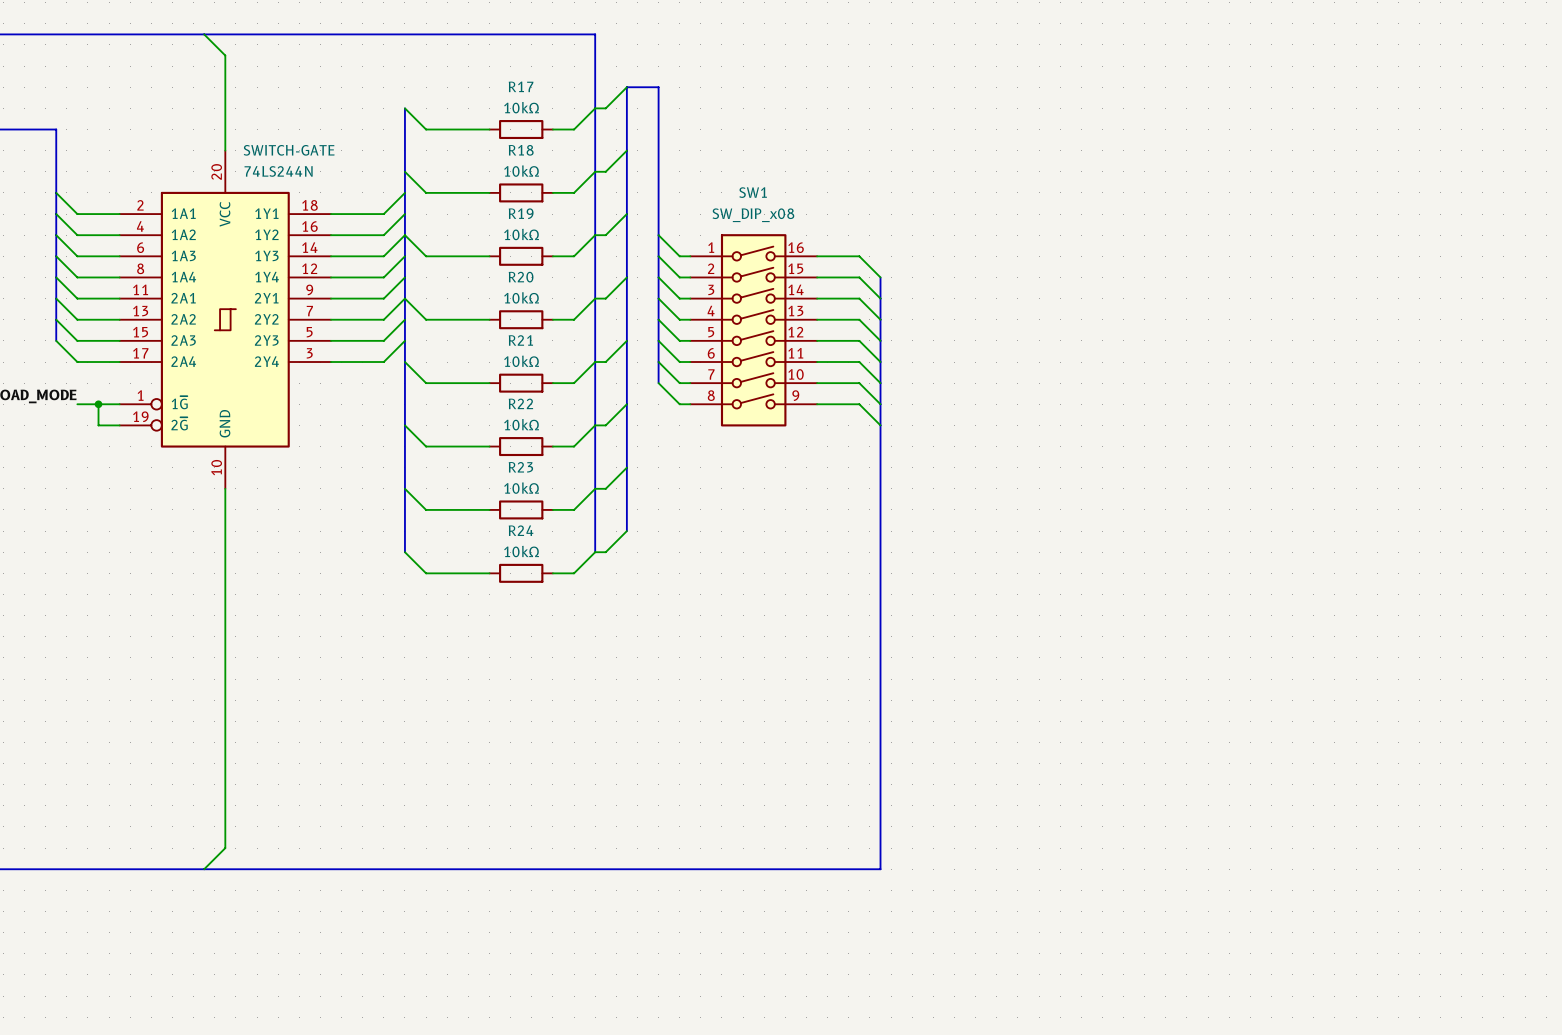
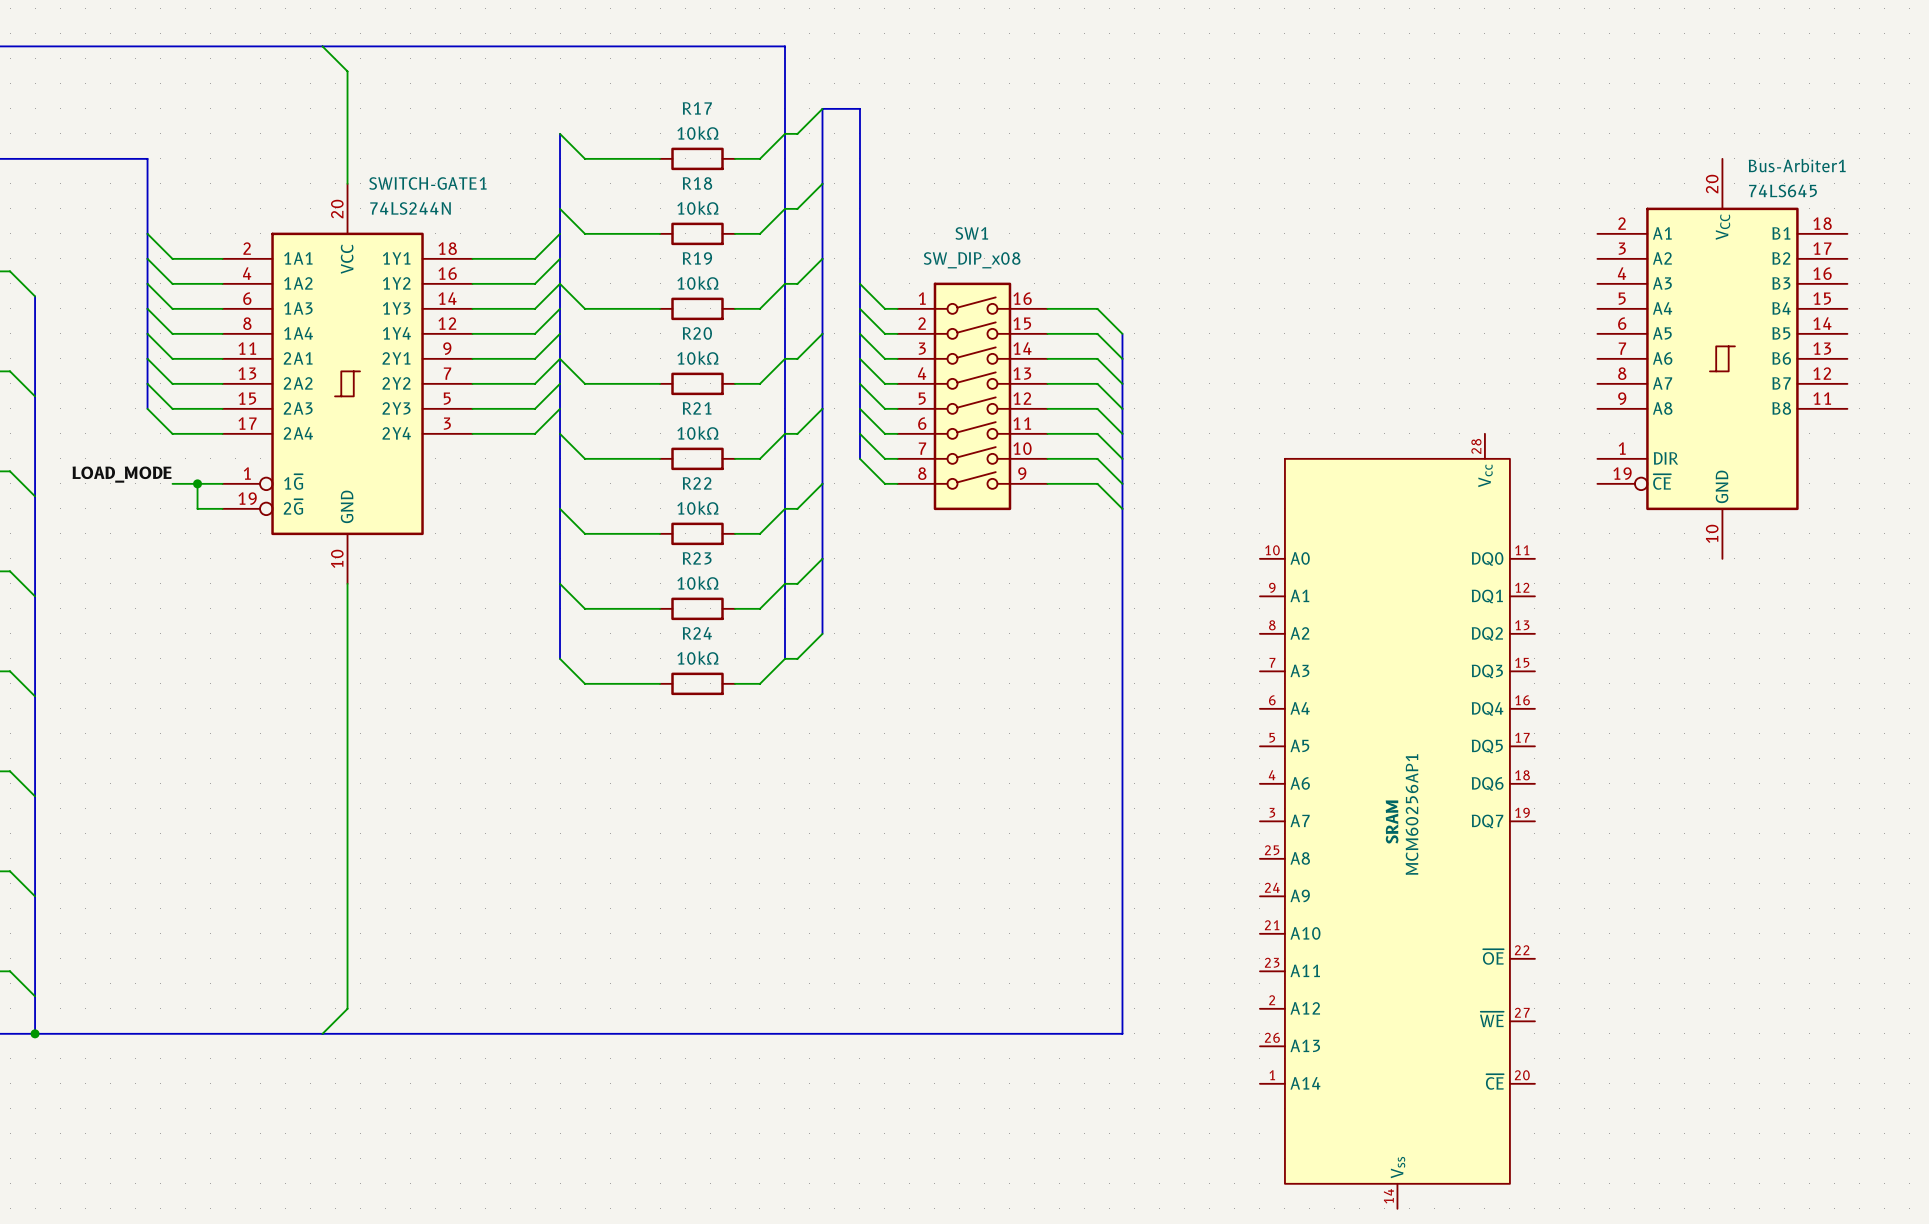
SWITCH-GATE name: SWITCH-GATE (289, 150) -> SWITCH-GATE1 (427, 183)
Bus-Arbiter1: none -> 74LS645 (1722, 358)
MCM60256AP1: none -> SRAM (1397, 821)

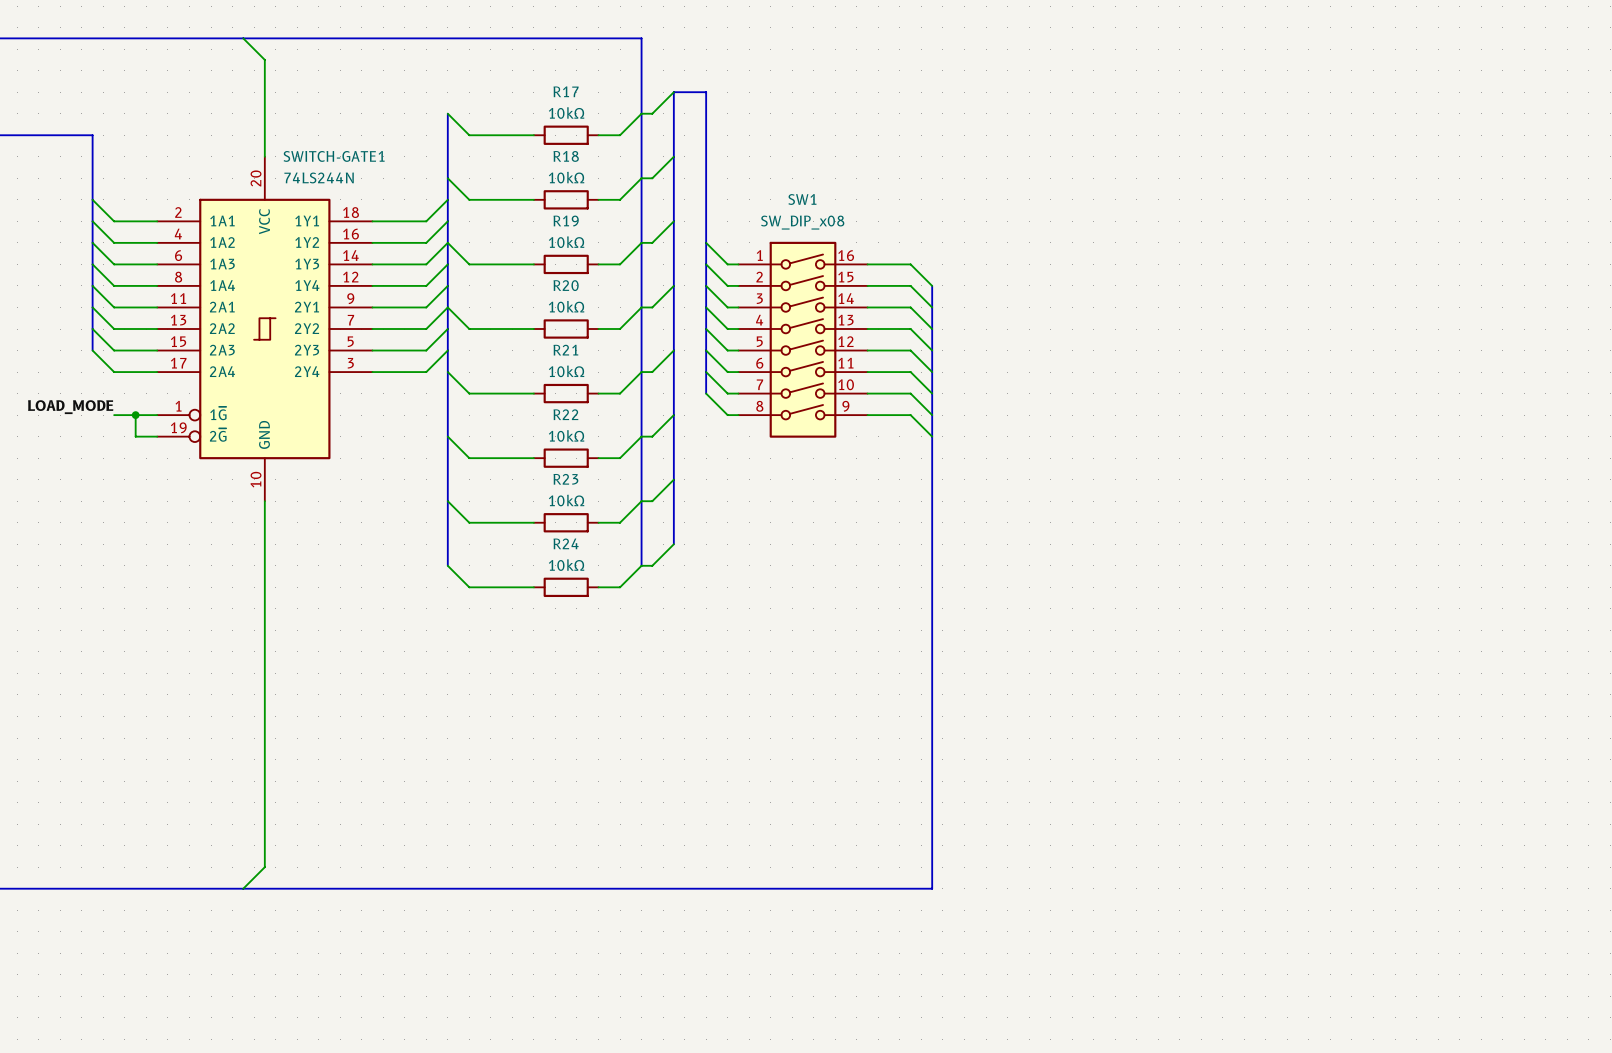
Bus-Arbiter1: 74LS645 (1722, 358) -> none
MCM60256AP1: SRAM (1397, 821) -> none

